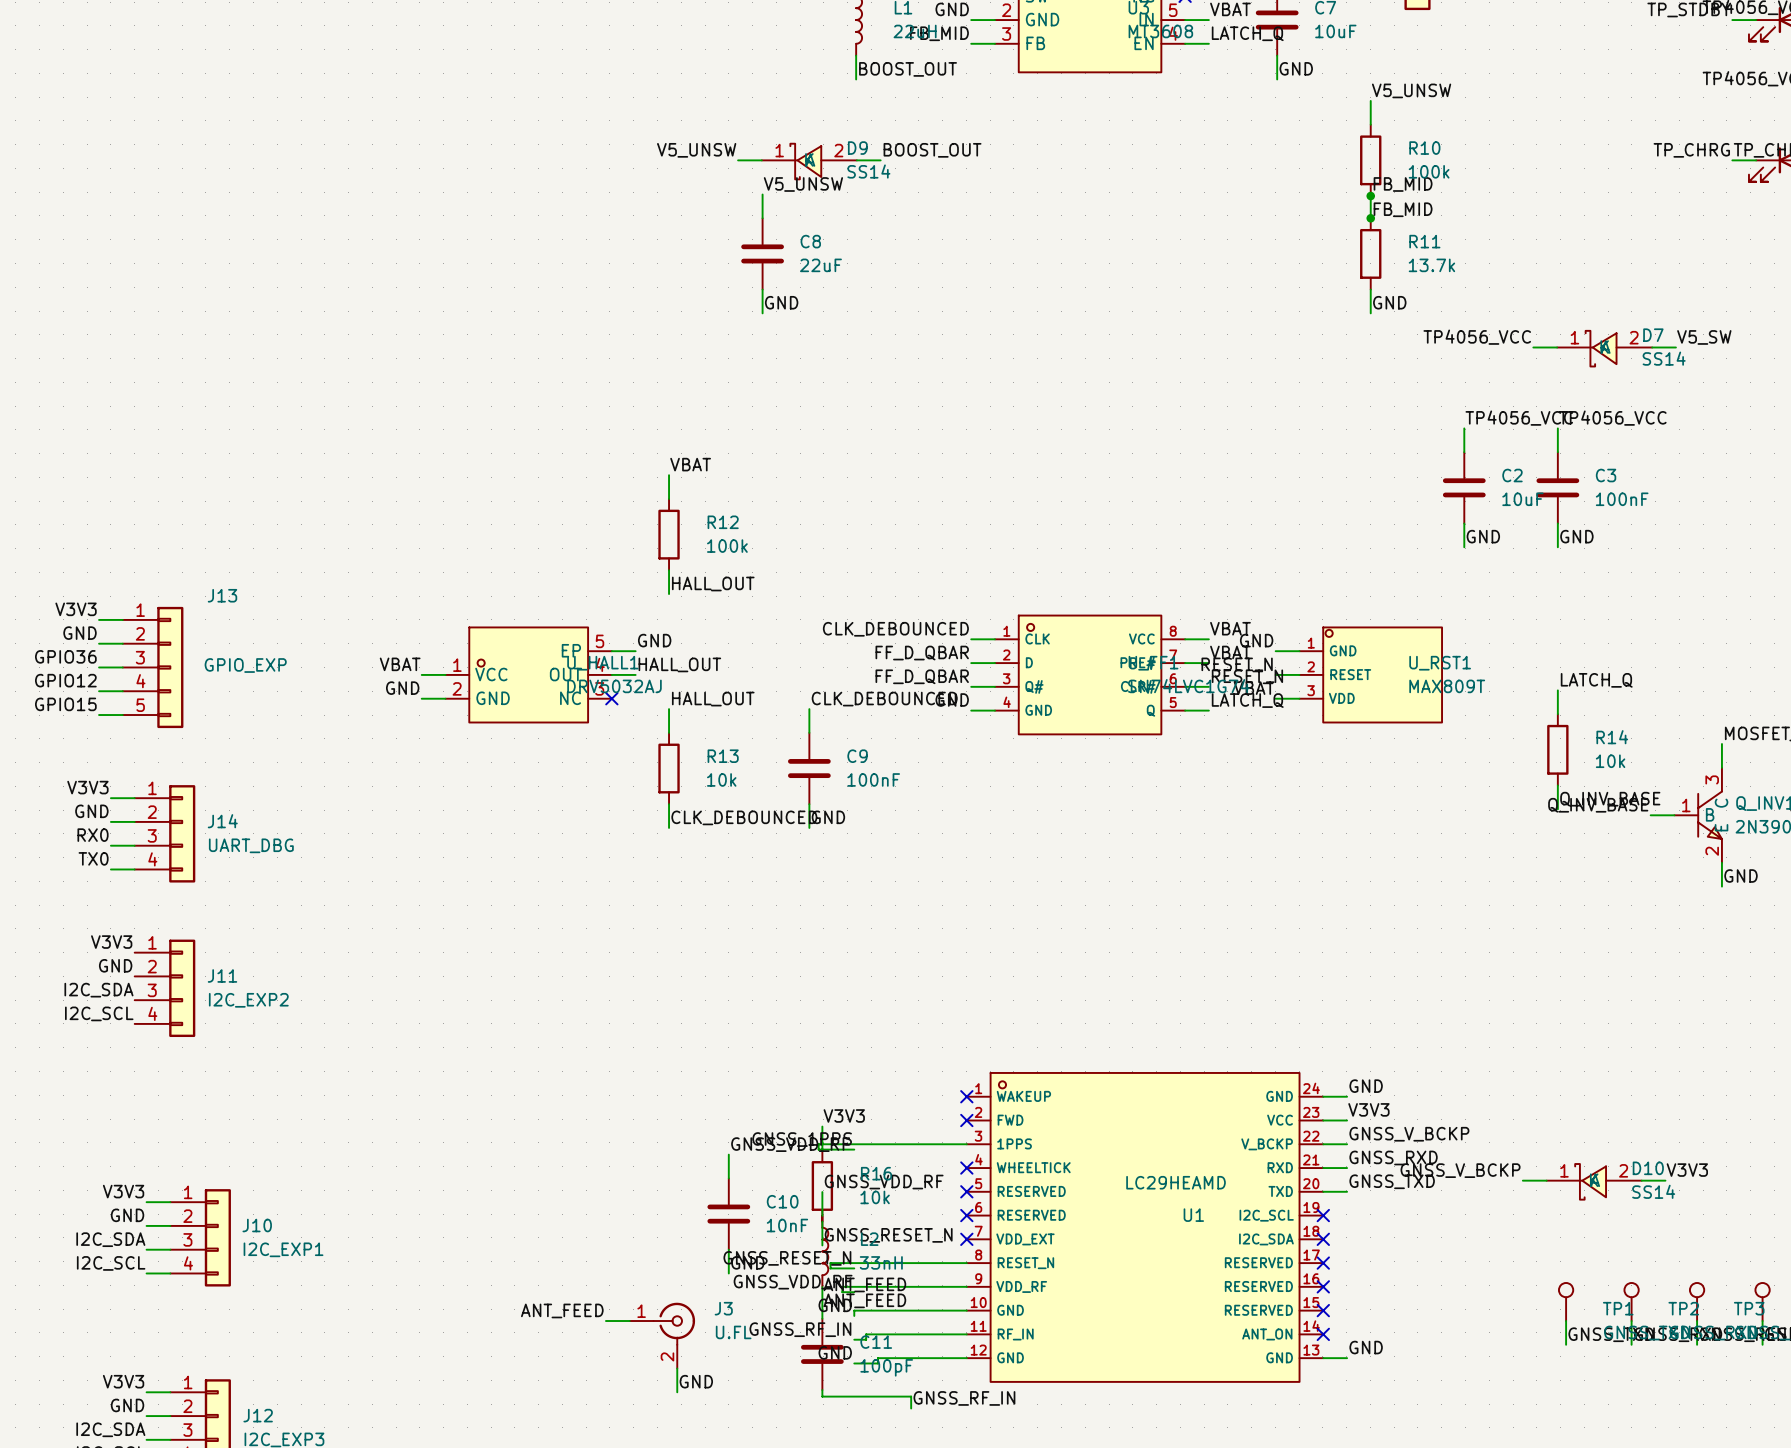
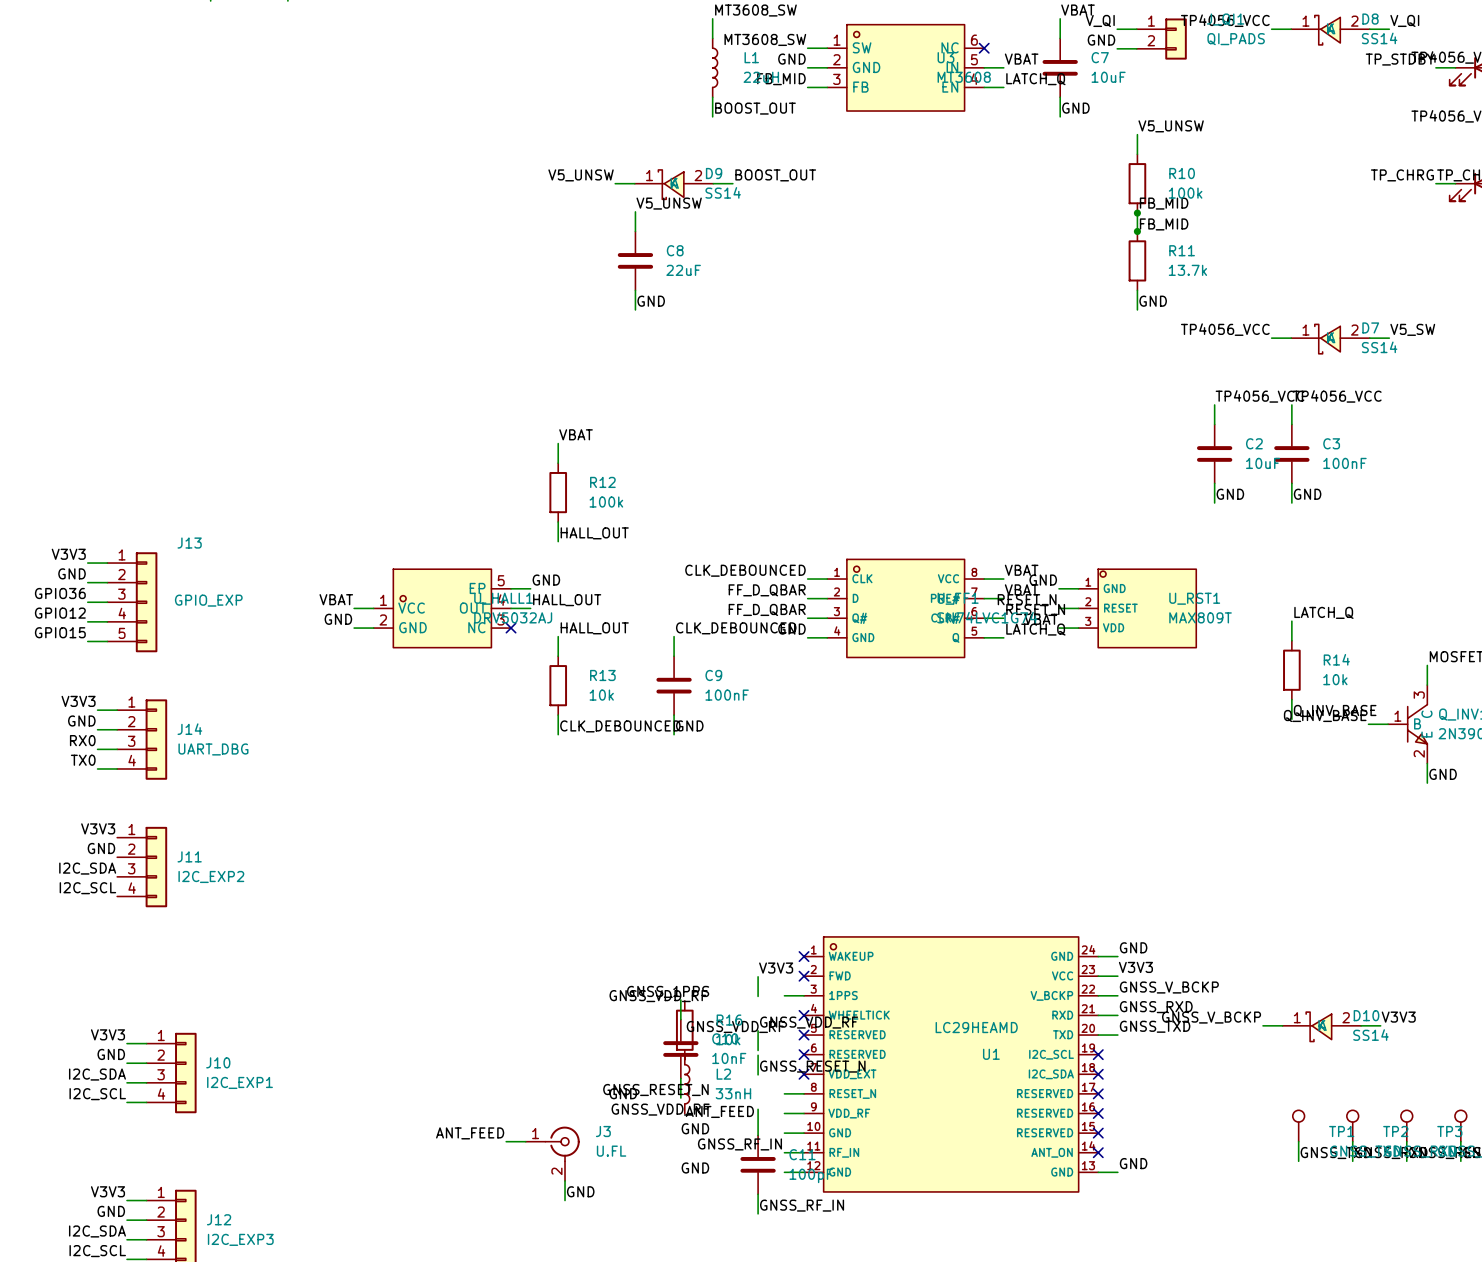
label position: V3V3 (844, 1115) -> V3V3 (776, 968)
wire: (822, 1126) (822, 1150) -> (758, 976) (758, 996)
wire: (943, 1144) (818, 1144) (818, 1149) (854, 1149) -> none
wire: (728, 1154) (728, 1178) -> (680, 999) (680, 1019)
label: none -> GNSS_VDD_RF (809, 1022)
wire: (822, 1192) (822, 1215) -> (758, 1030) (758, 1050)
C10 position: (728, 1214) -> (680, 1049)
wire: (822, 1221) (822, 1245) -> (758, 1055) (758, 1074)
label position: GNSS_RESET_N (888, 1235) -> GNSS_RESET_N (812, 1066)
wire: (728, 1249) (728, 1273) -> (680, 1078) (680, 1098)
wire: (943, 1263) (830, 1263) (830, 1268) (854, 1268) -> none
wire: (943, 1286) (842, 1286) (842, 1292) (854, 1292) -> none
wire: (822, 1287) (822, 1318) -> (758, 1109) (758, 1135)
label: ANT_FEED (864, 1300) -> none
wire: (943, 1310) (854, 1310) (854, 1315) -> none
label position: GNSS_RF_IN (800, 1329) -> GNSS_RF_IN (739, 1144)
wire: (943, 1334) (866, 1334) (866, 1339) (854, 1339) -> none
C11 position: (822, 1354) -> (758, 1164)
wire: (943, 1358) (878, 1358) (878, 1363) (854, 1363) -> none
wire: (822, 1390) (822, 1396) (911, 1396) -> (758, 1194) (758, 1204)

